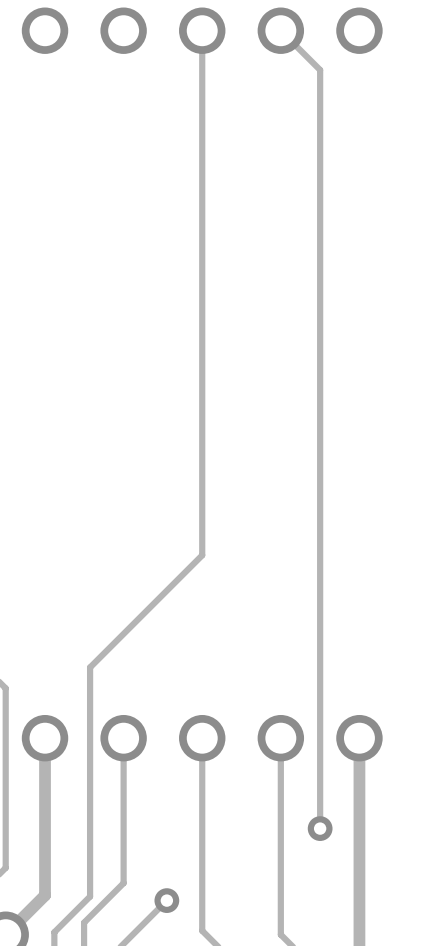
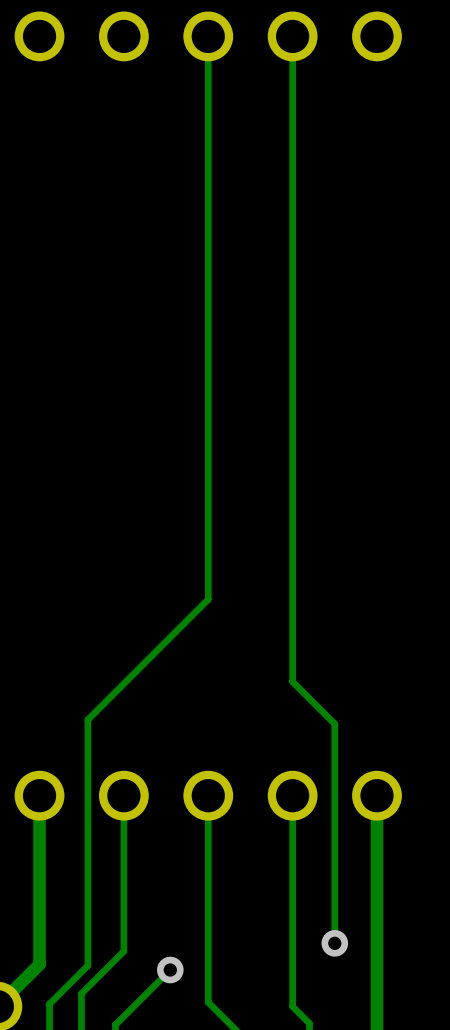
track: (280, 30) (320, 70) (320, 671) -> (292, 36) (292, 681) (334, 723)
track: none -> (334, 892) (334, 943)
via position: (320, 828) -> (334, 943)

